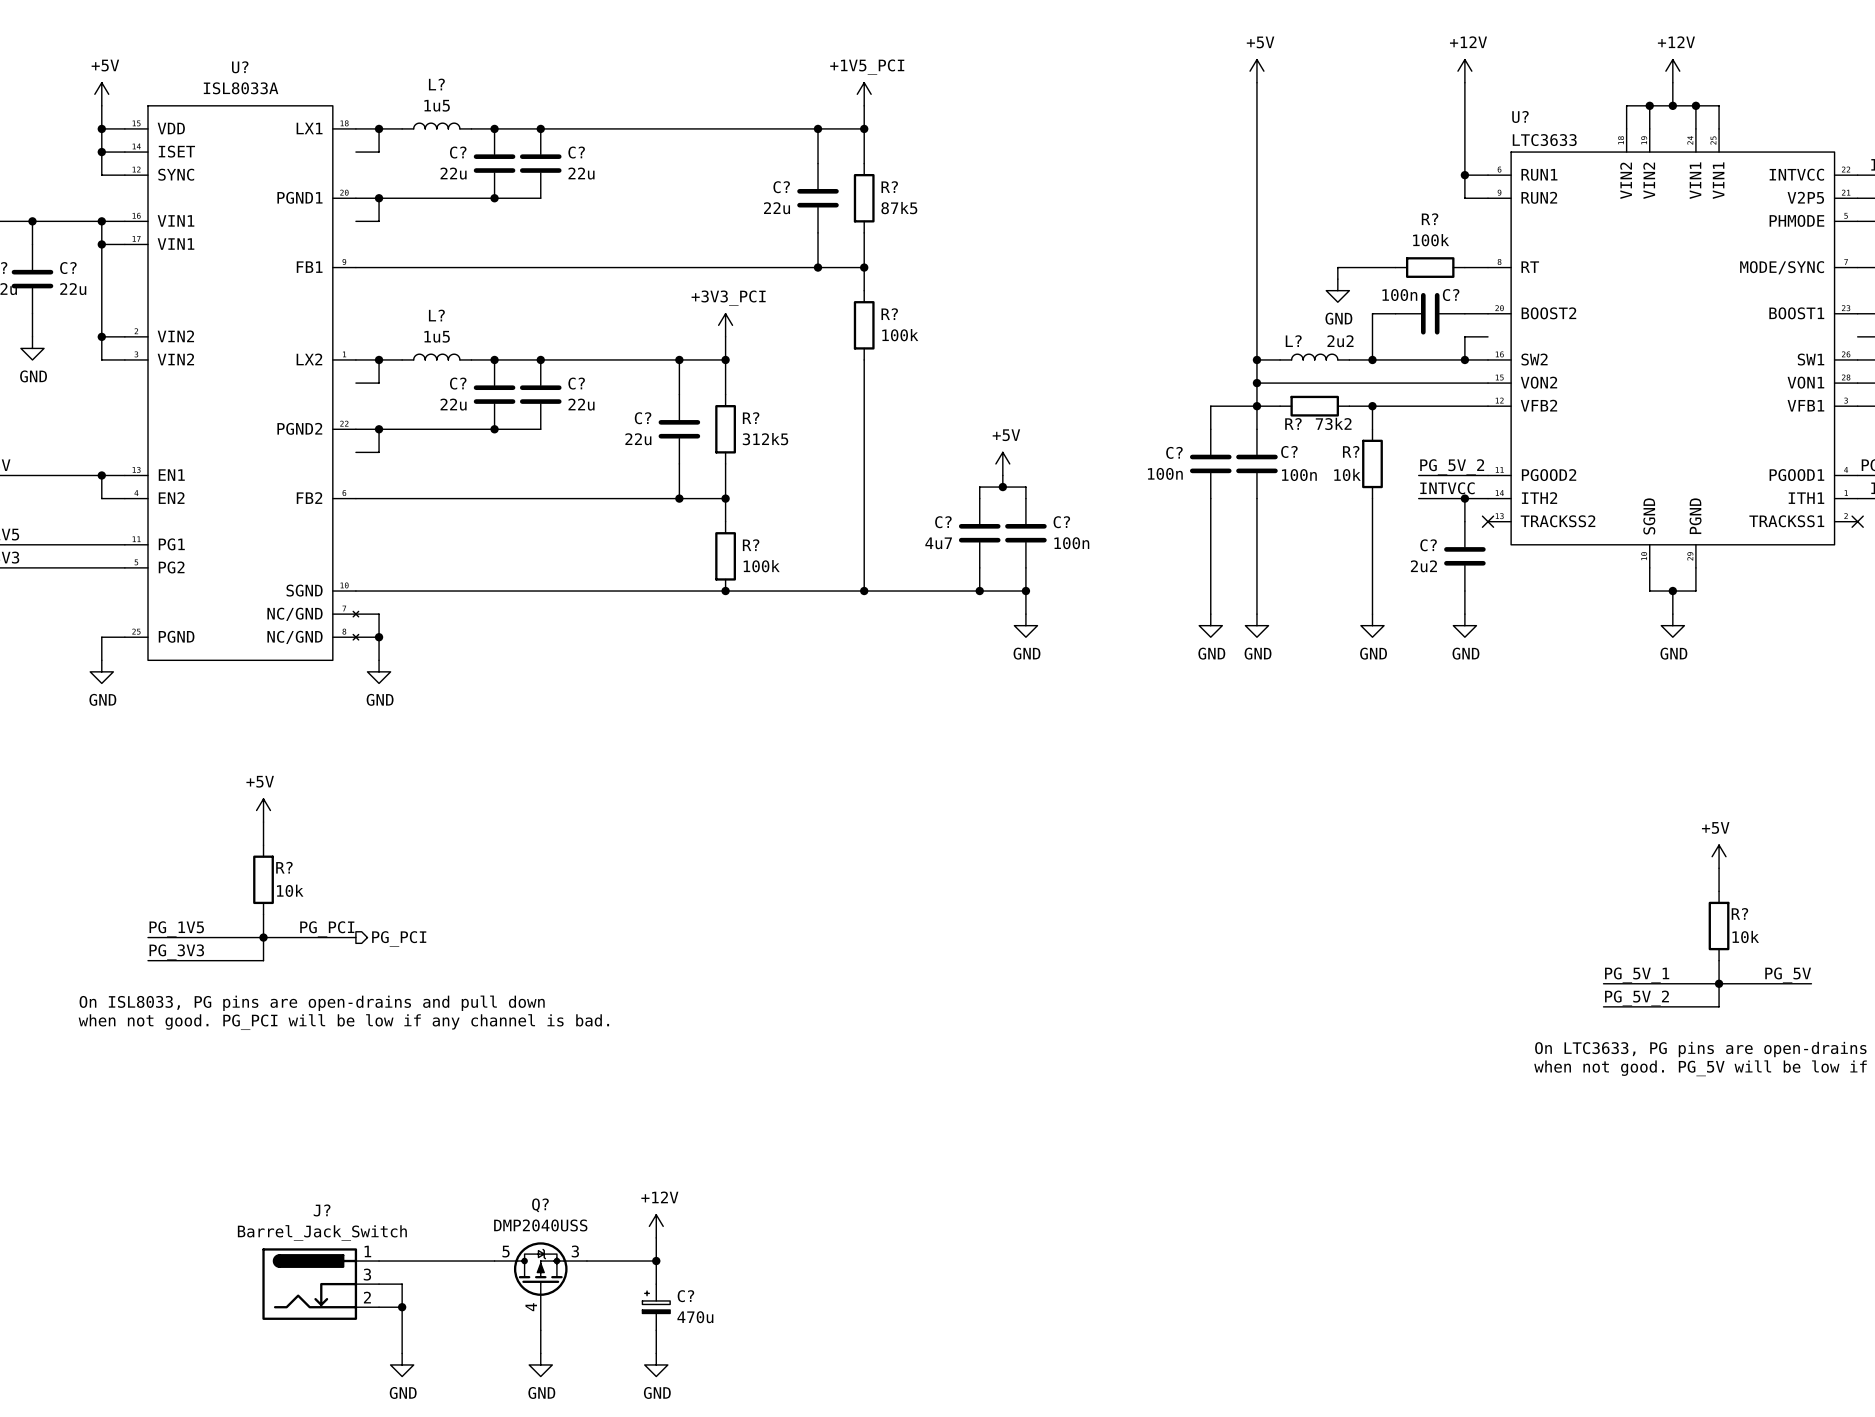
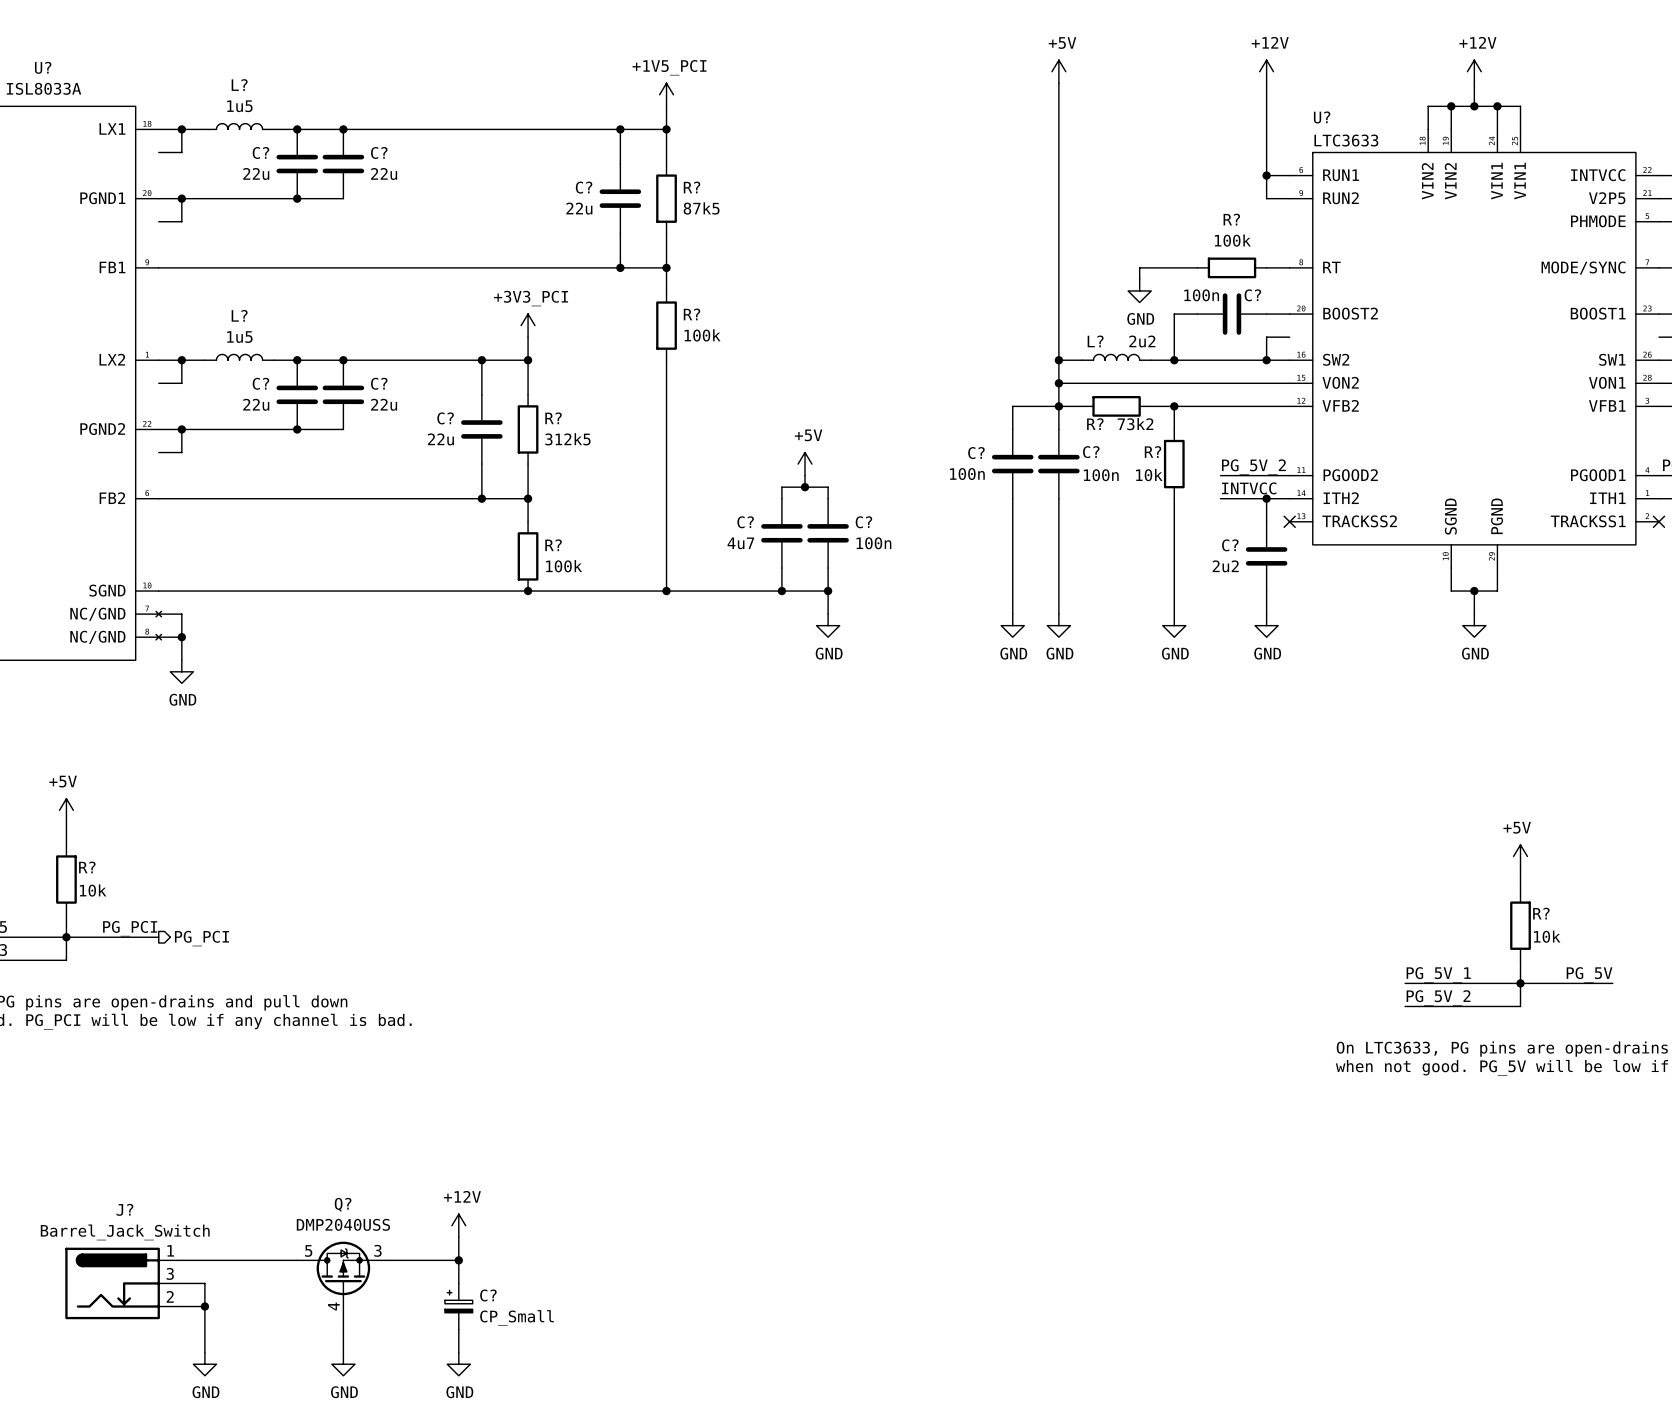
C? value: 470u (695, 1317) -> CP_Small (517, 1318)

